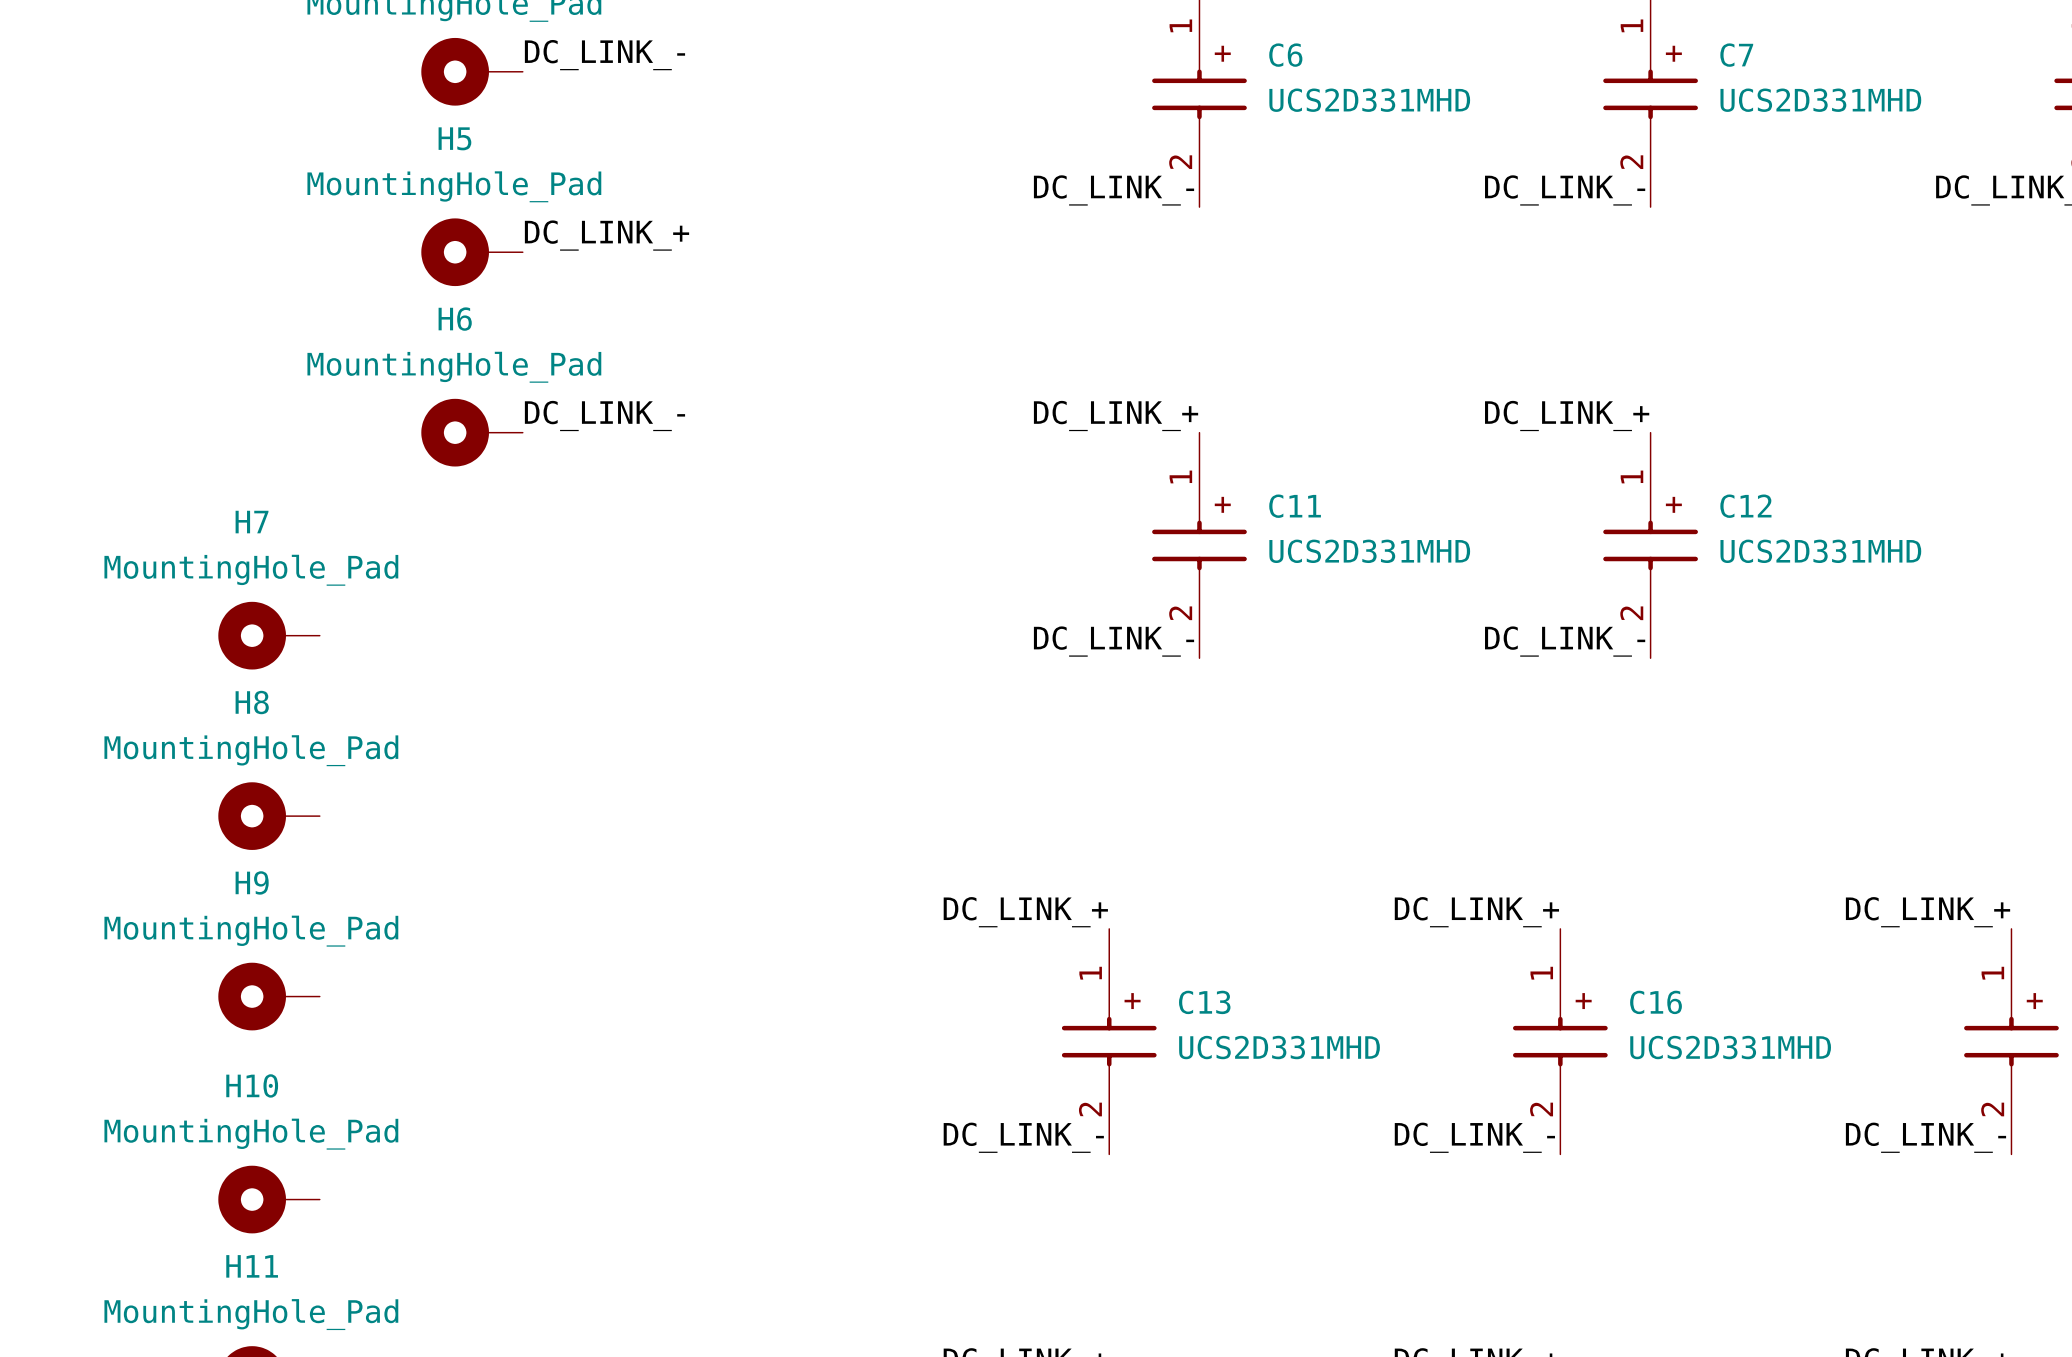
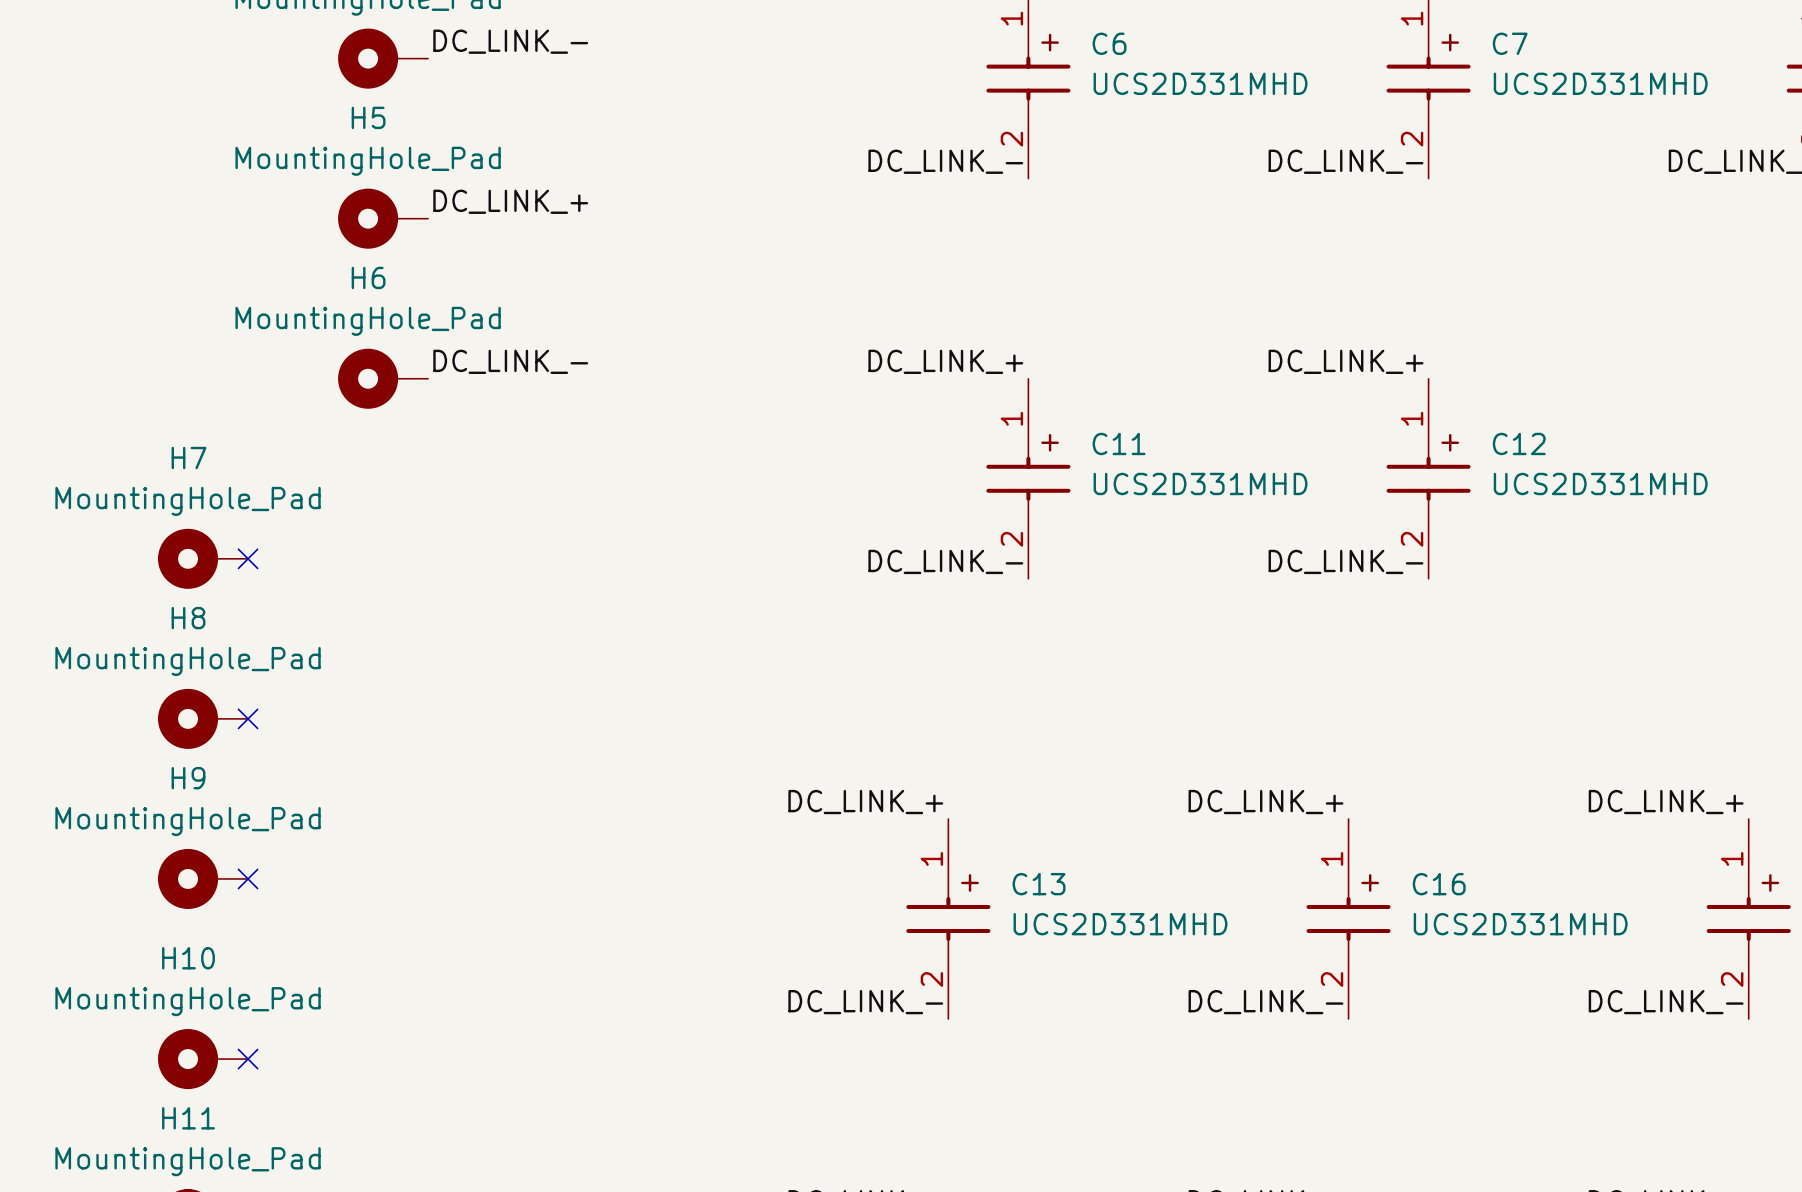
no-connect mark: none -> (248, 558)
no-connect mark: none -> (248, 718)
no-connect mark: none -> (248, 878)
no-connect mark: none -> (248, 1059)

